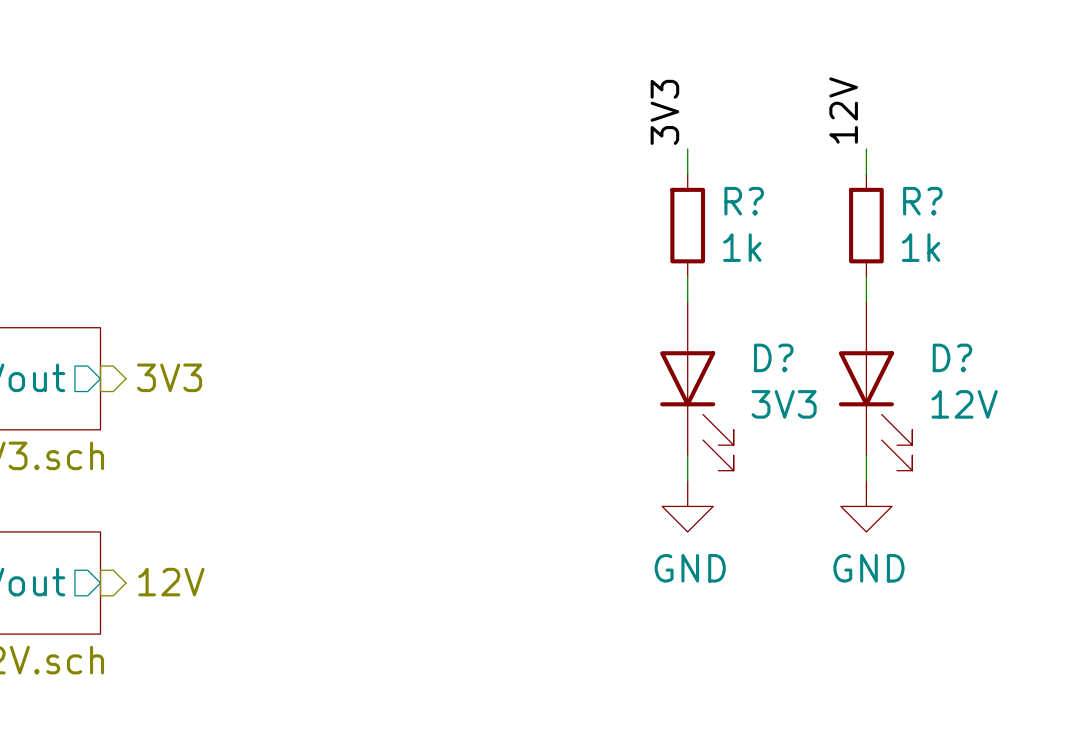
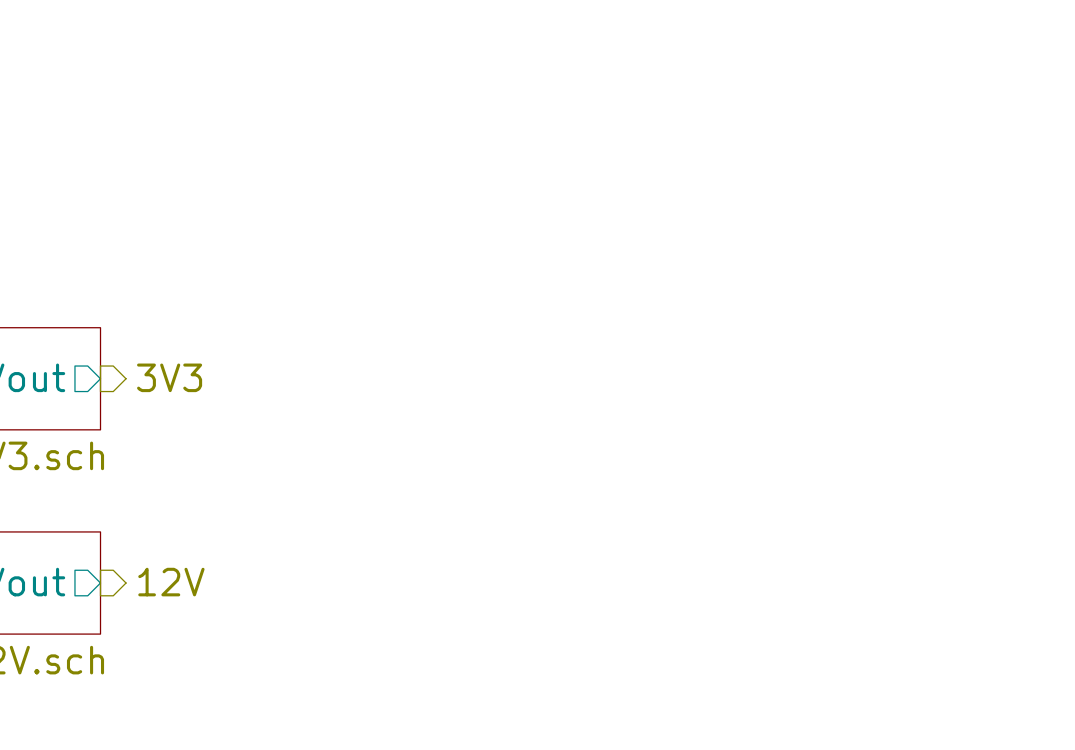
label: 12V (843, 110) -> none
label: 3V3 (664, 112) -> none
wire: (687, 149) (687, 174) -> none
wire: (866, 149) (866, 174) -> none
R?: 1k (687, 225) -> none
R?: 1k (866, 225) -> none
wire: (687, 276) (687, 302) -> none
wire: (866, 276) (866, 302) -> none
D?: 3V3 (696, 386) -> none
D?: 12V (875, 386) -> none
wire: (687, 455) (687, 480) -> none
wire: (866, 455) (866, 480) -> none
power symbol: GND (687, 506) -> none
power symbol: GND (866, 506) -> none

